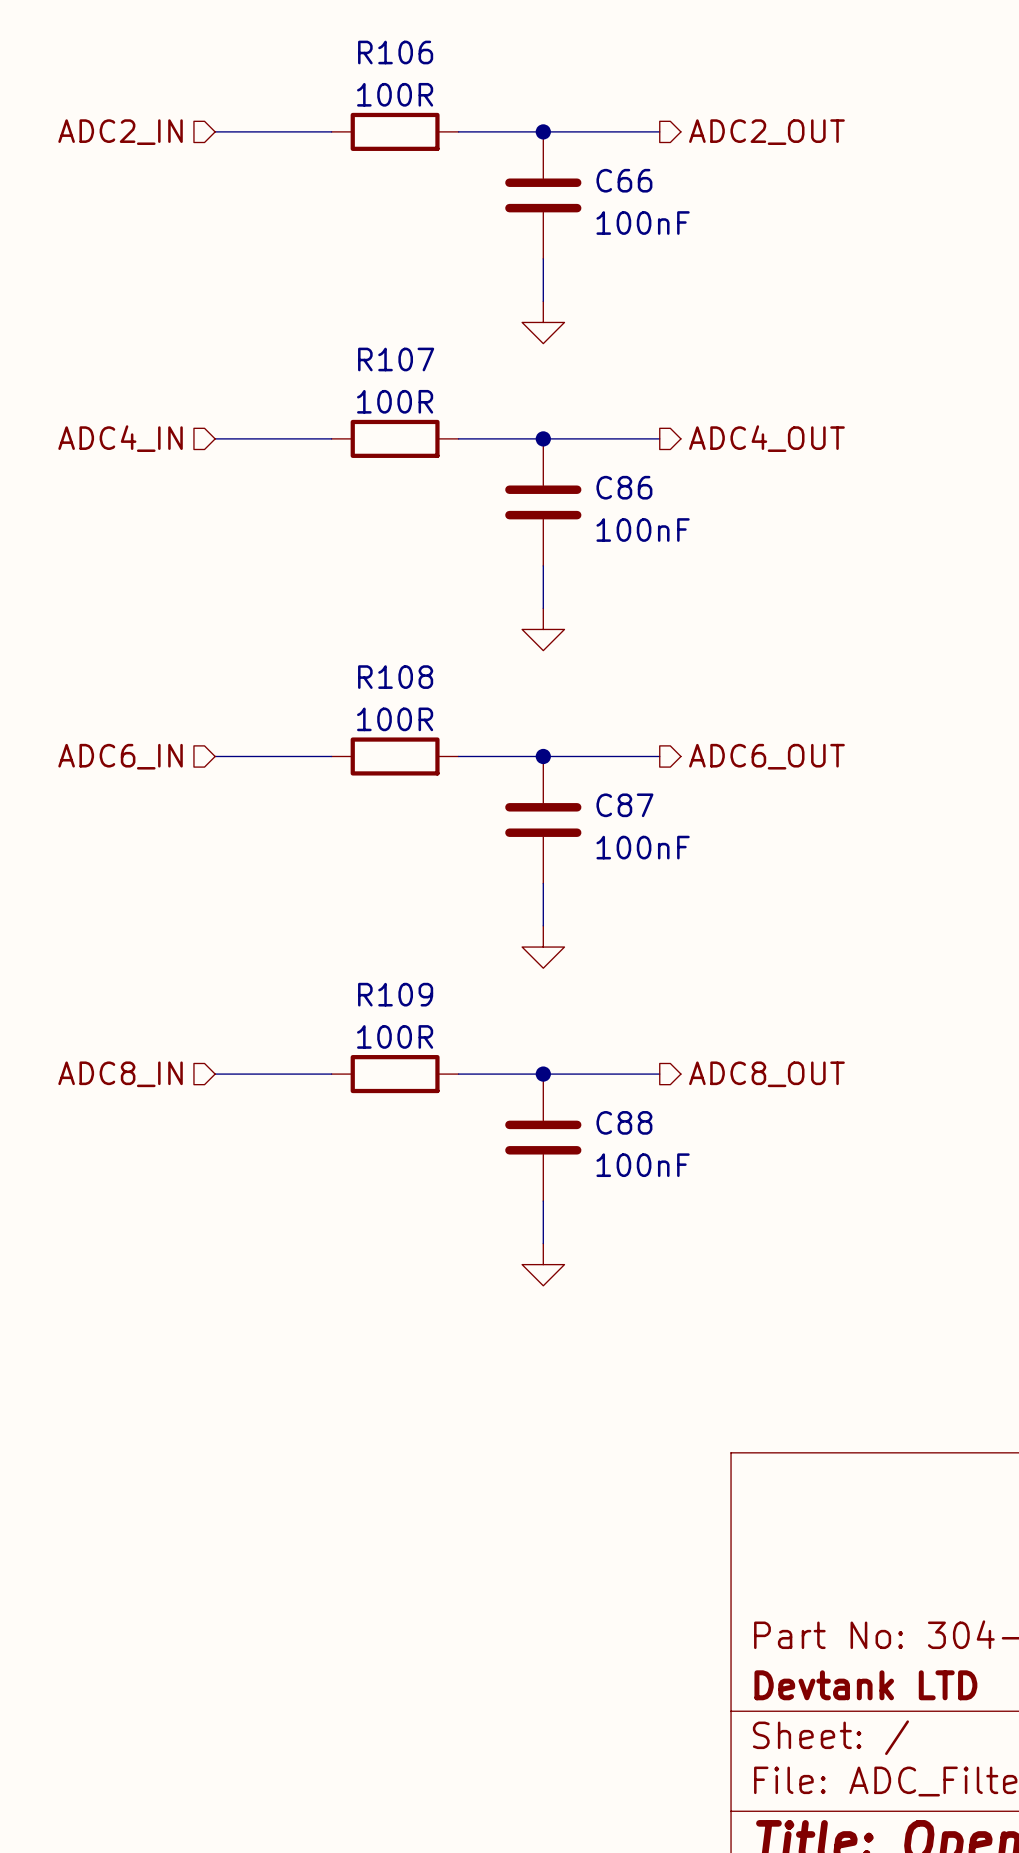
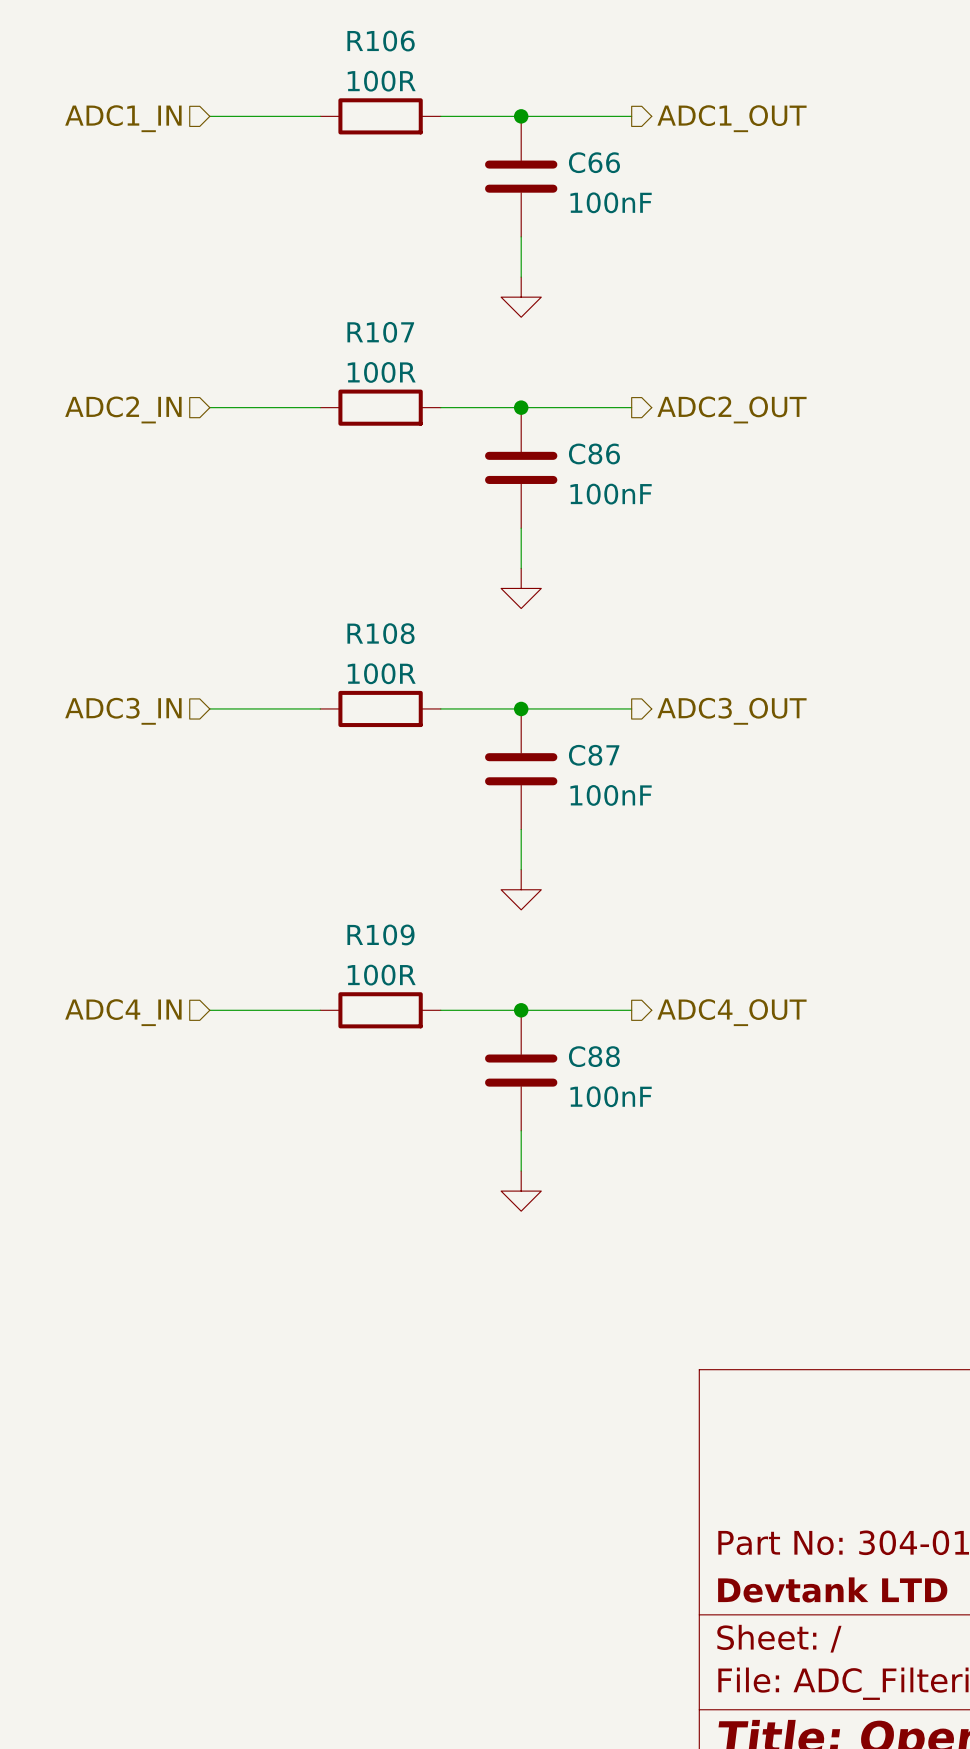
hierarchical label: ADC2_IN (120, 132) -> ADC1_IN (123, 118)
hierarchical label: ADC2_OUT (766, 132) -> ADC1_OUT (731, 118)
hierarchical label: ADC4_IN (120, 438) -> ADC2_IN (123, 409)
hierarchical label: ADC4_OUT (766, 438) -> ADC2_OUT (731, 409)
hierarchical label: ADC6_IN (120, 756) -> ADC3_IN (123, 711)
hierarchical label: ADC6_OUT (766, 756) -> ADC3_OUT (731, 711)
hierarchical label: ADC8_IN (120, 1074) -> ADC4_IN (123, 1012)
hierarchical label: ADC8_OUT (766, 1074) -> ADC4_OUT (731, 1012)

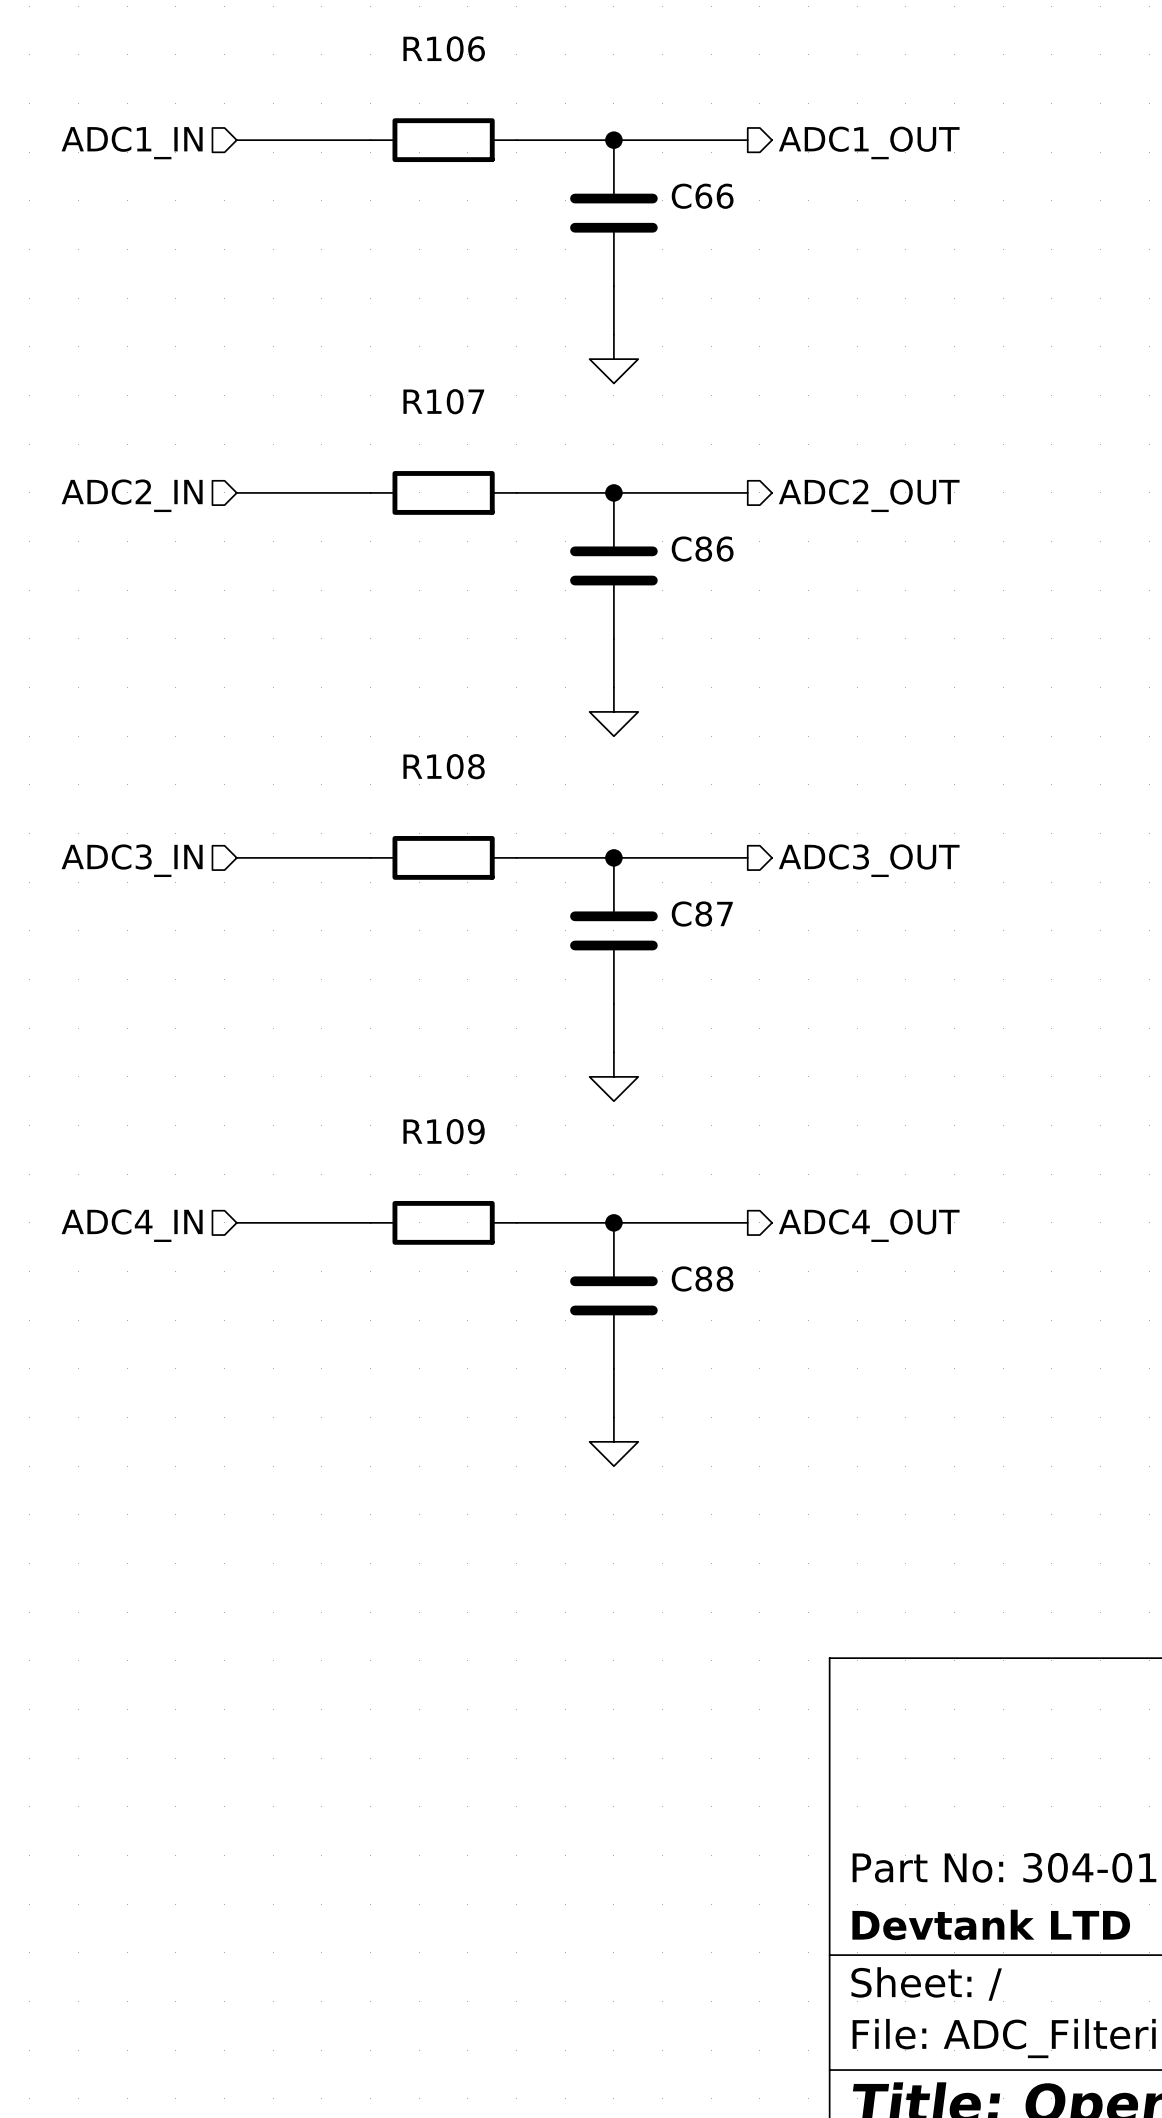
R106 value: 100R (381, 81) -> none
C66 value: 100nF (611, 202) -> none
R107 value: 100R (381, 372) -> none
C86 value: 100nF (611, 494) -> none
R108 value: 100R (381, 673) -> none
C87 value: 100nF (611, 795) -> none
R109 value: 100R (381, 975) -> none
C88 value: 100nF (611, 1096) -> none

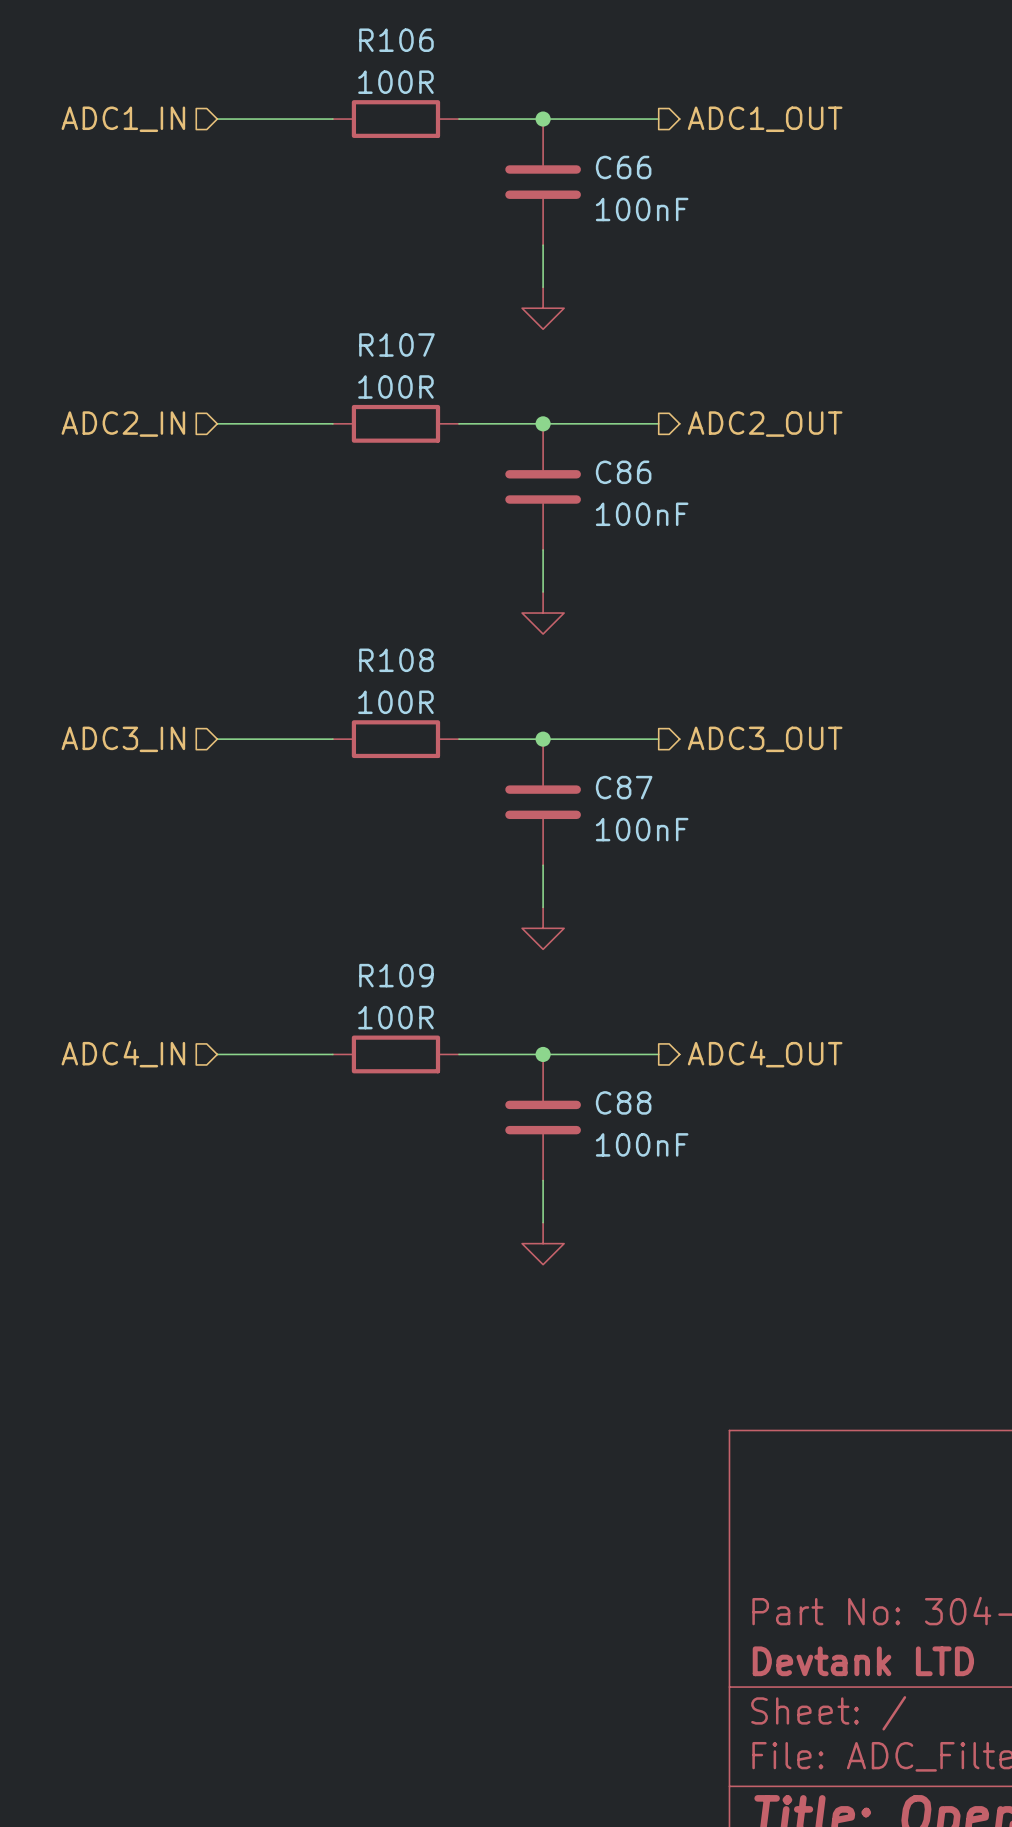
R106 value: none -> 100R (395, 82)
C66 value: none -> 100nF (642, 209)
R107 value: none -> 100R (395, 386)
C86 value: none -> 100nF (642, 514)
R108 value: none -> 100R (395, 702)
C87 value: none -> 100nF (642, 829)
R109 value: none -> 100R (395, 1017)
C88 value: none -> 100nF (642, 1144)

